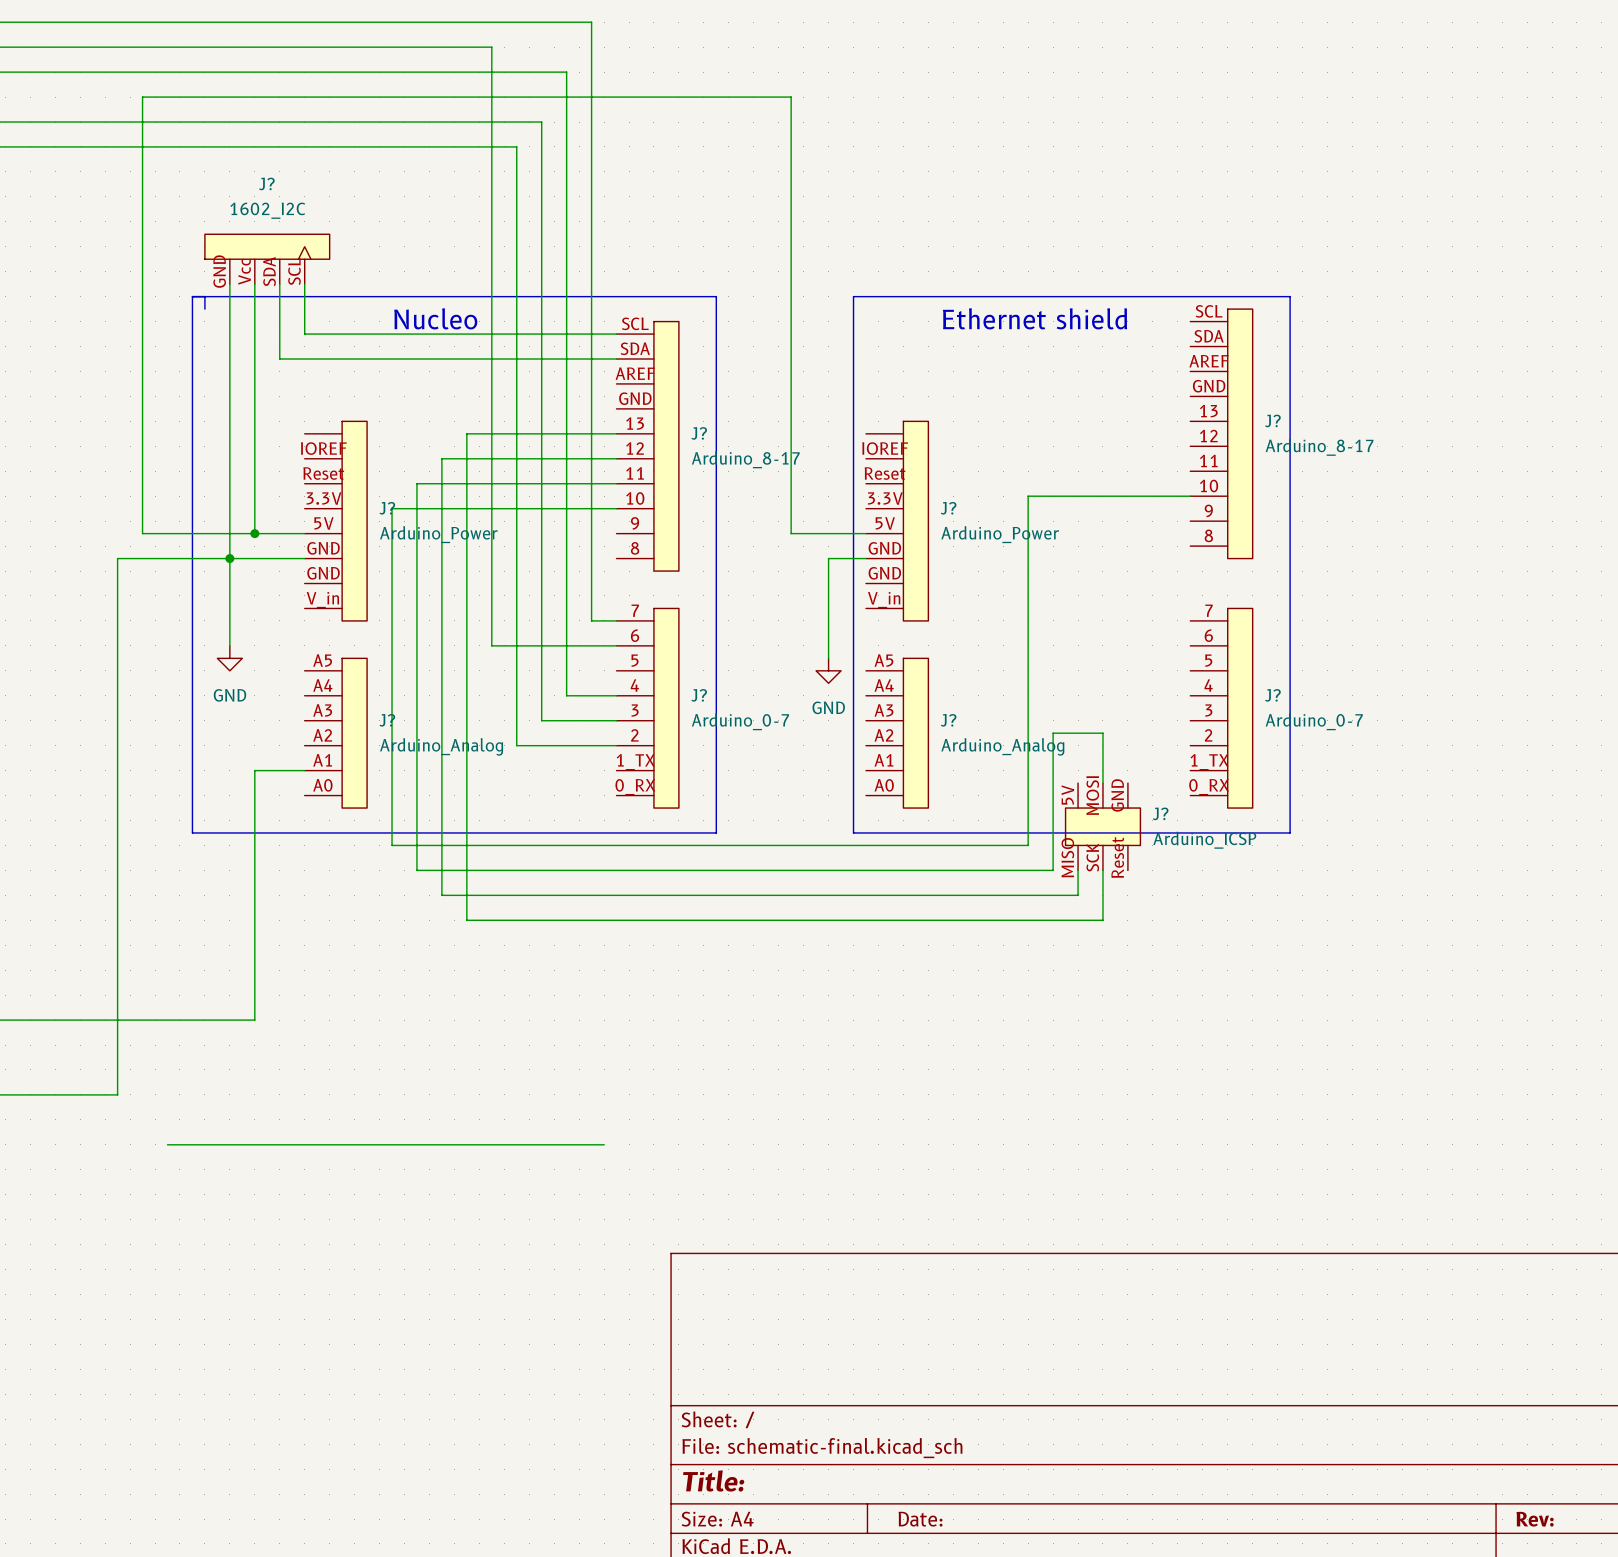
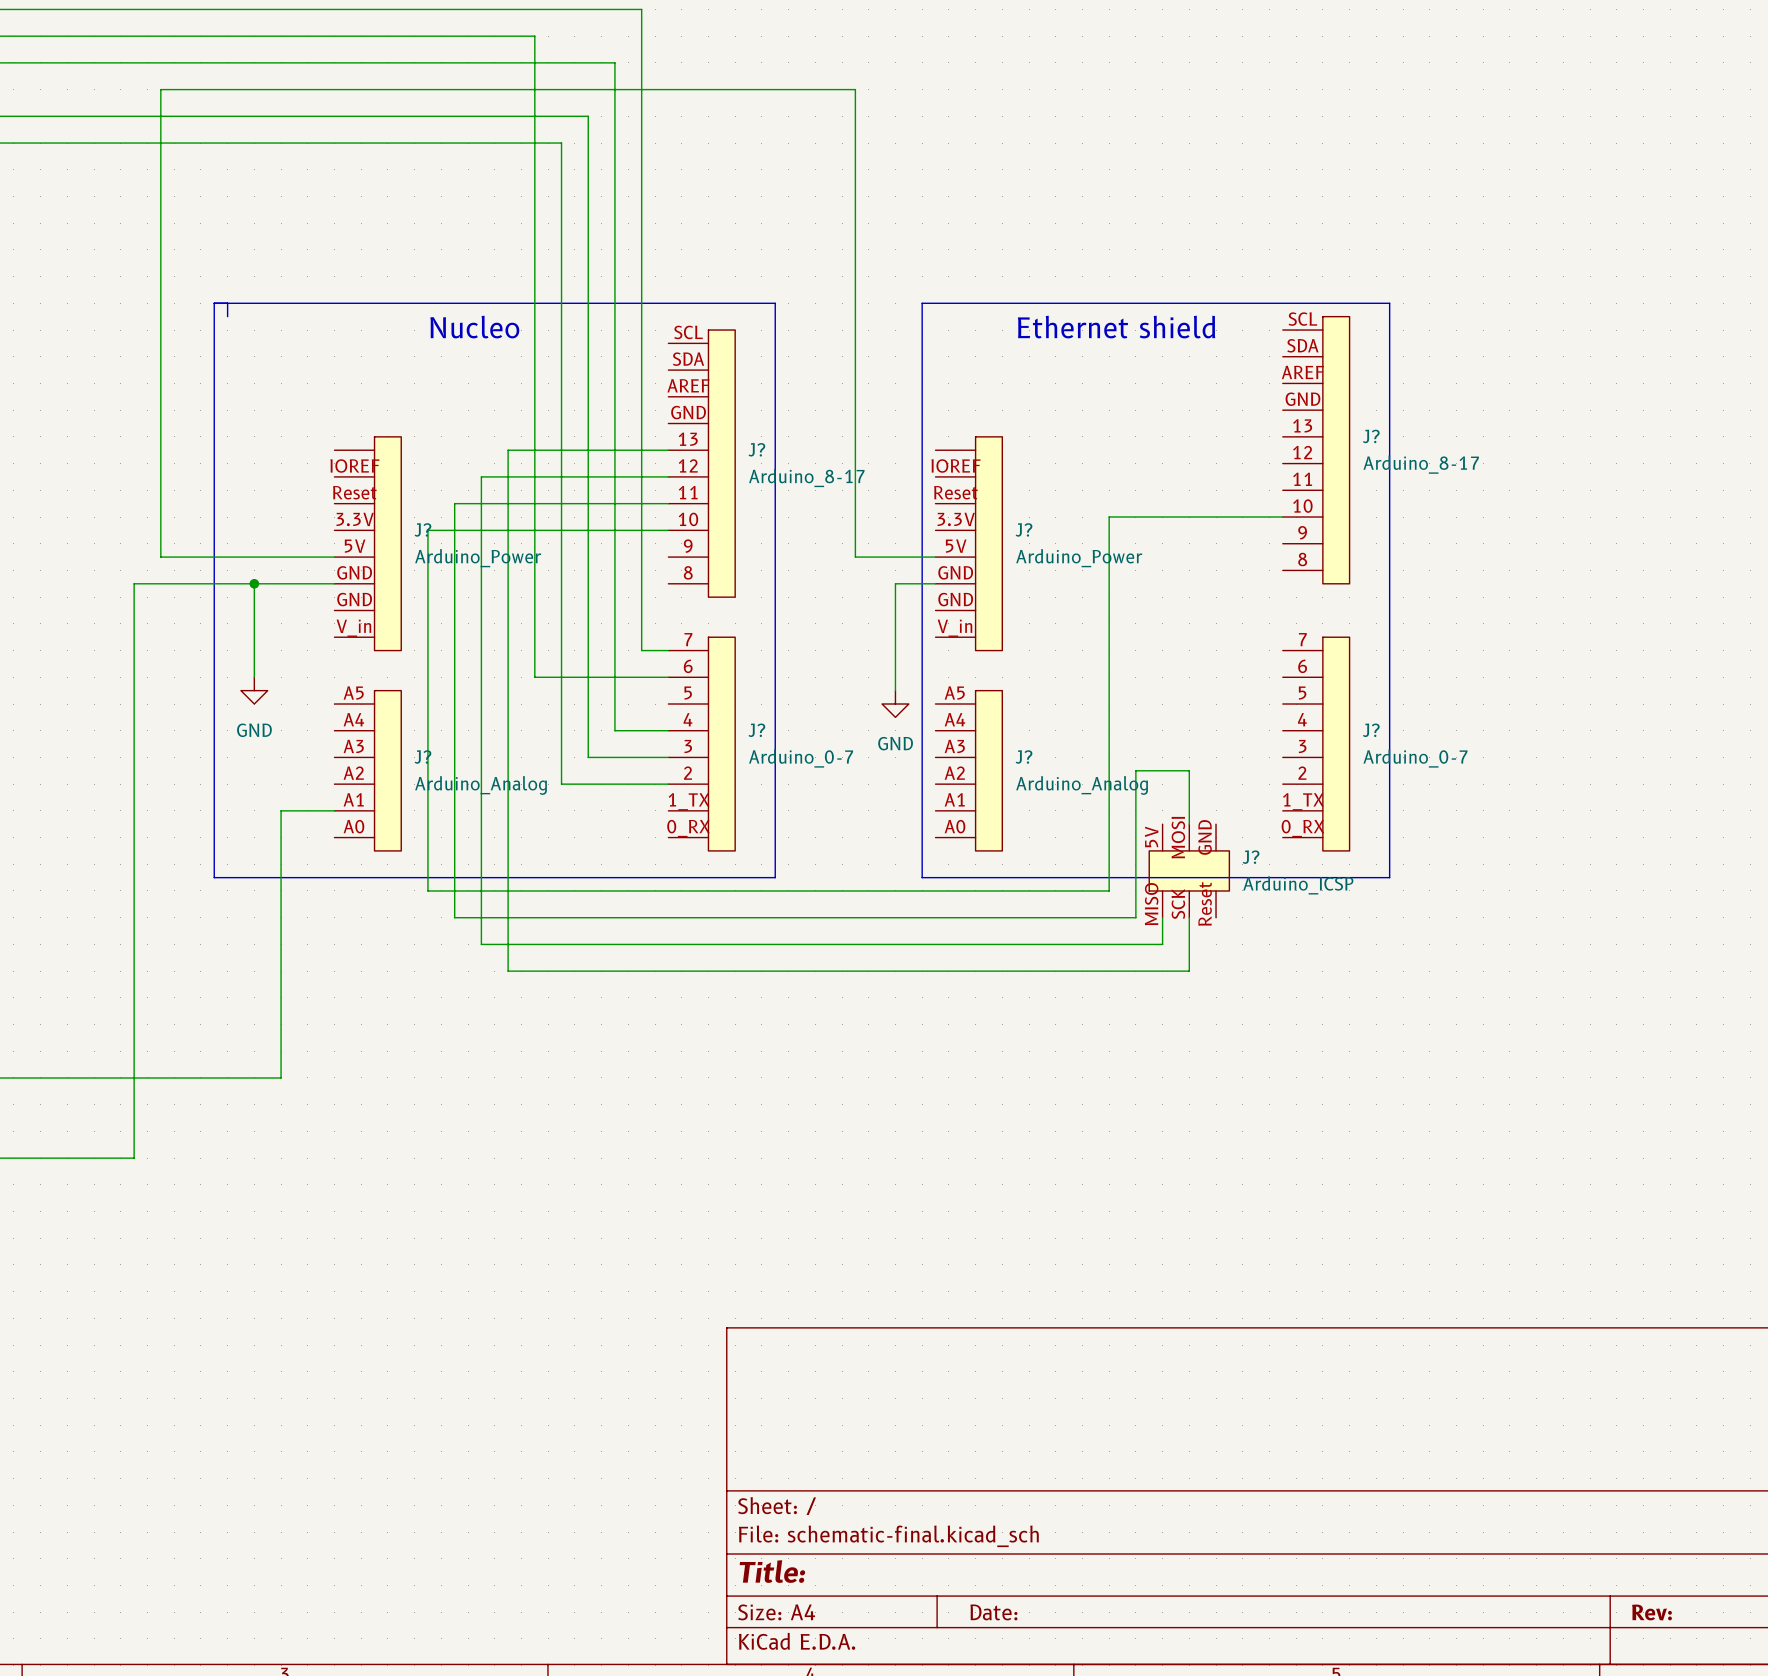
J?: 1602_I2C (267, 259) -> none
wire: (229, 284) (229, 558) -> none
wire: (254, 284) (254, 533) -> none
wire: (279, 284) (279, 359) (616, 359) -> none
wire: (304, 284) (304, 334) (616, 334) -> none
junction: (254, 533) -> none
wire: (167, 1144) (604, 1144) -> none

